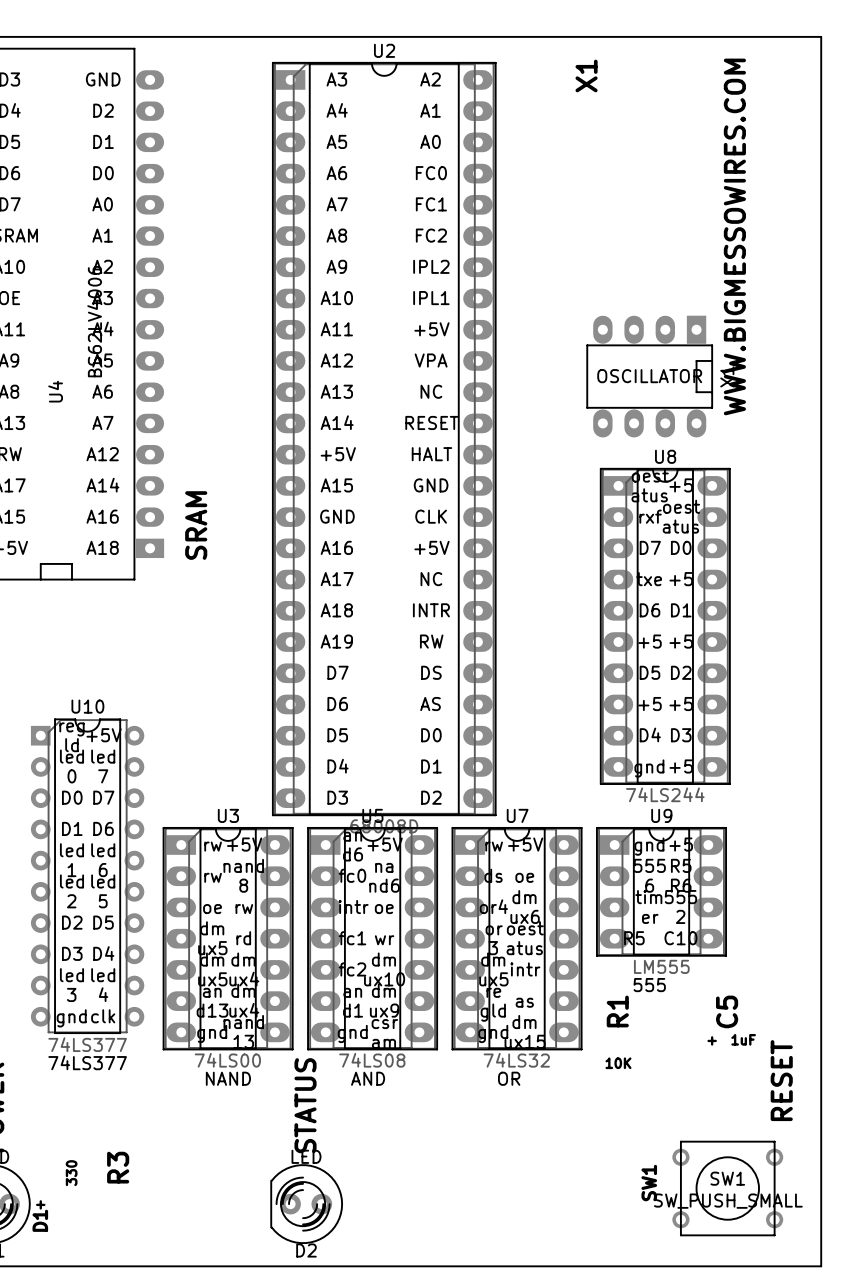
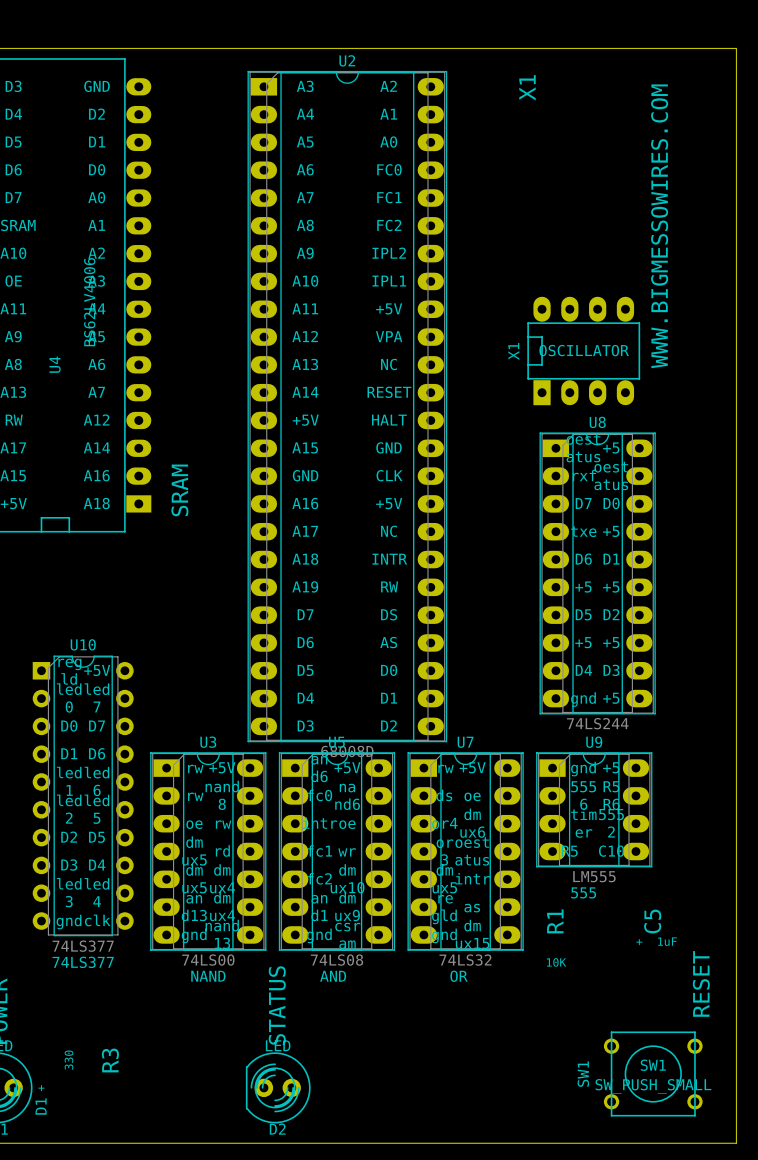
X1 rotation: 0° (649, 376) -> 180° (583, 350)

